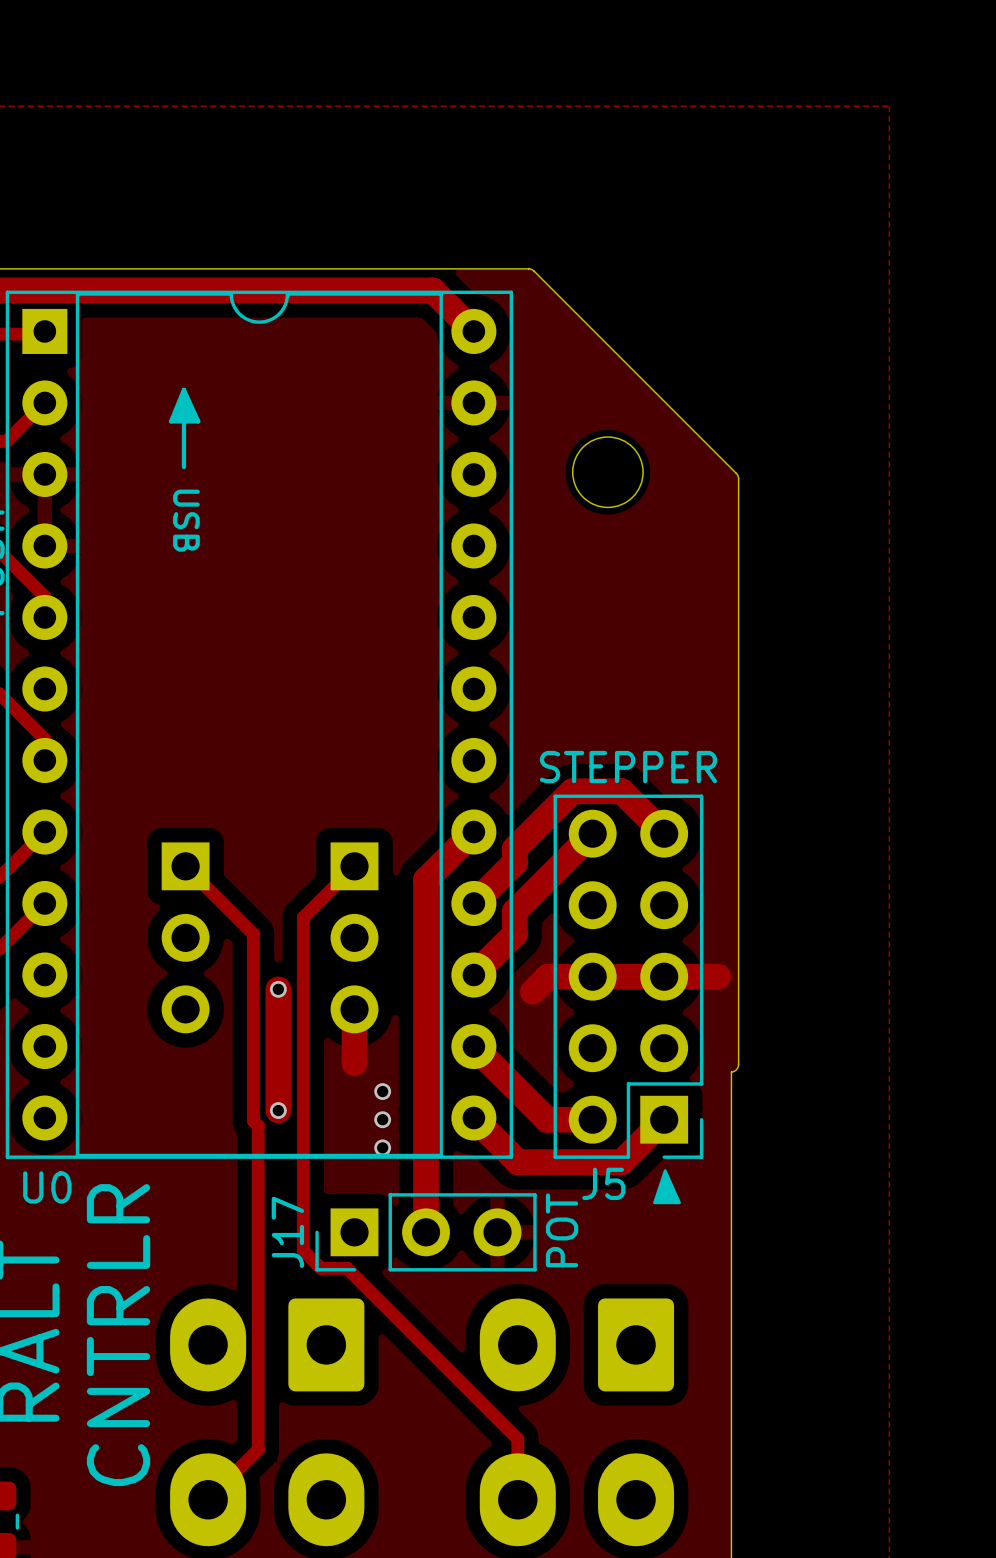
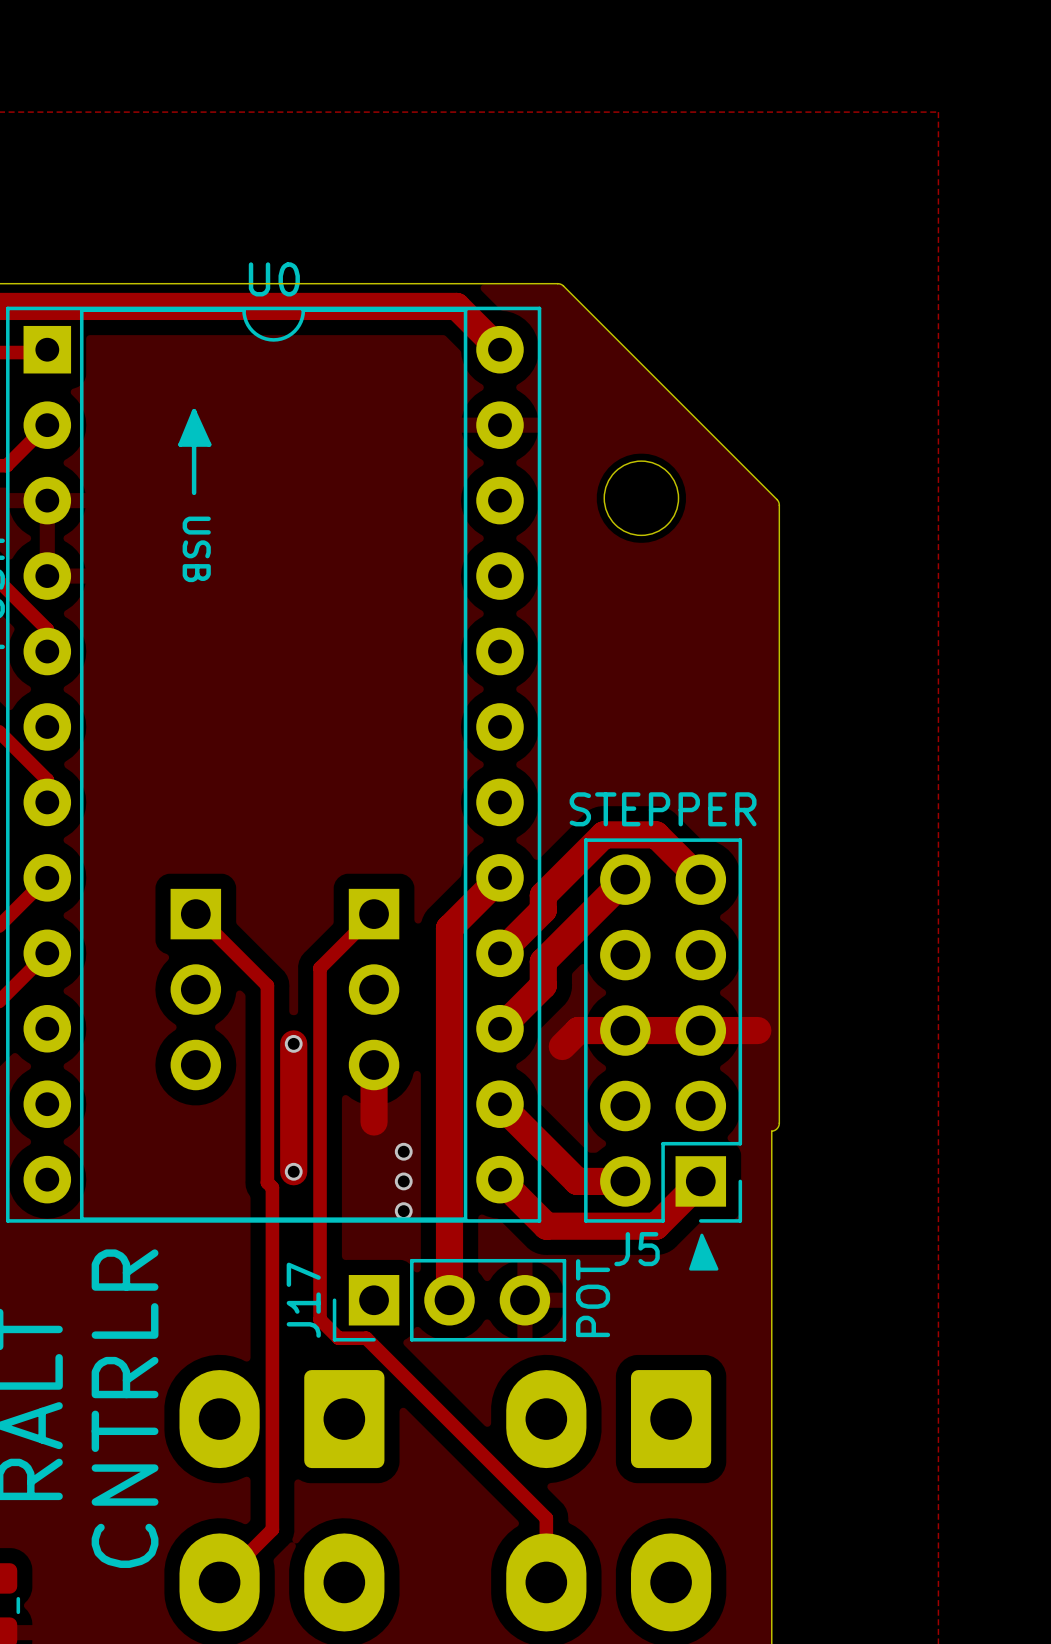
U0 name position: U0 (47, 1187) -> U0 (274, 279)

